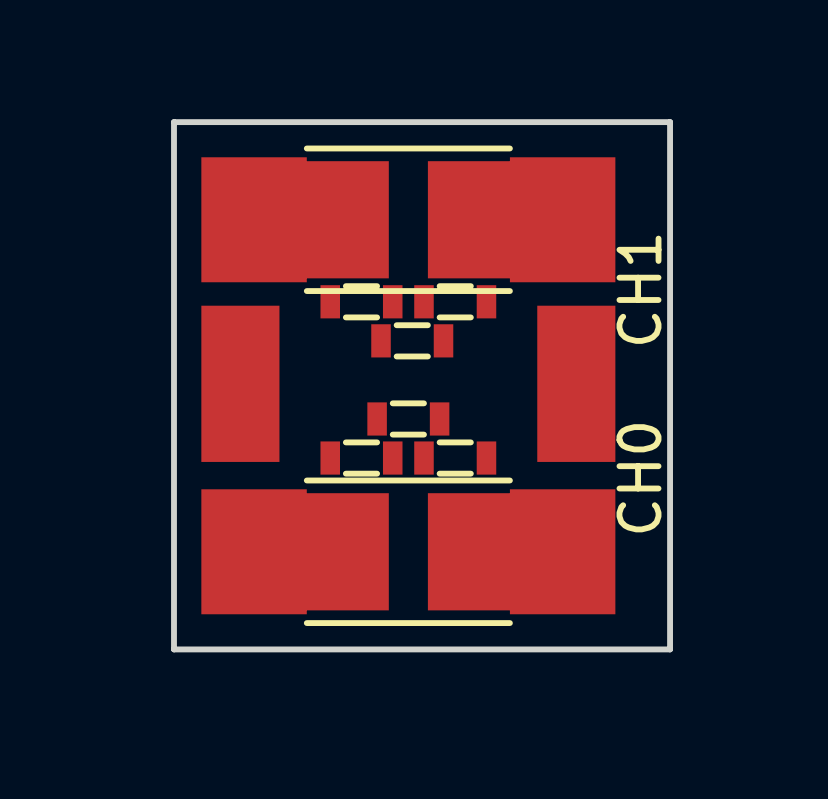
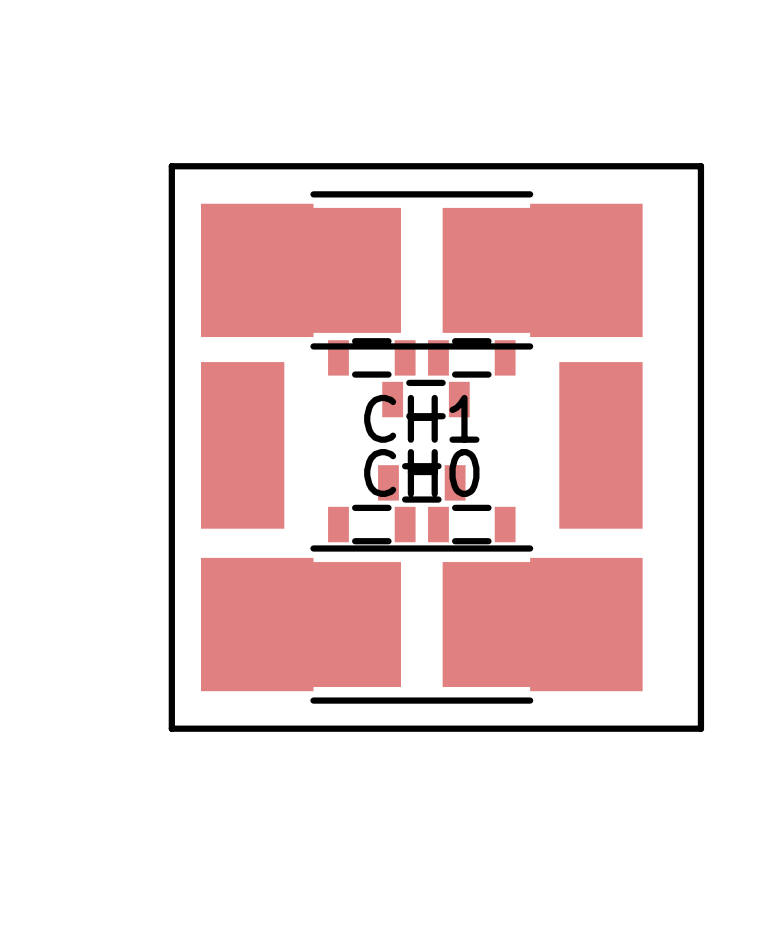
part value rotation: 0° (638, 289) -> 90° clockwise (421, 418)
part value position: CH1 (638, 289) -> CH1 (421, 418)
part value rotation: 0° (638, 478) -> 90° clockwise (421, 472)
part value position: CH0 (638, 478) -> CH0 (421, 472)

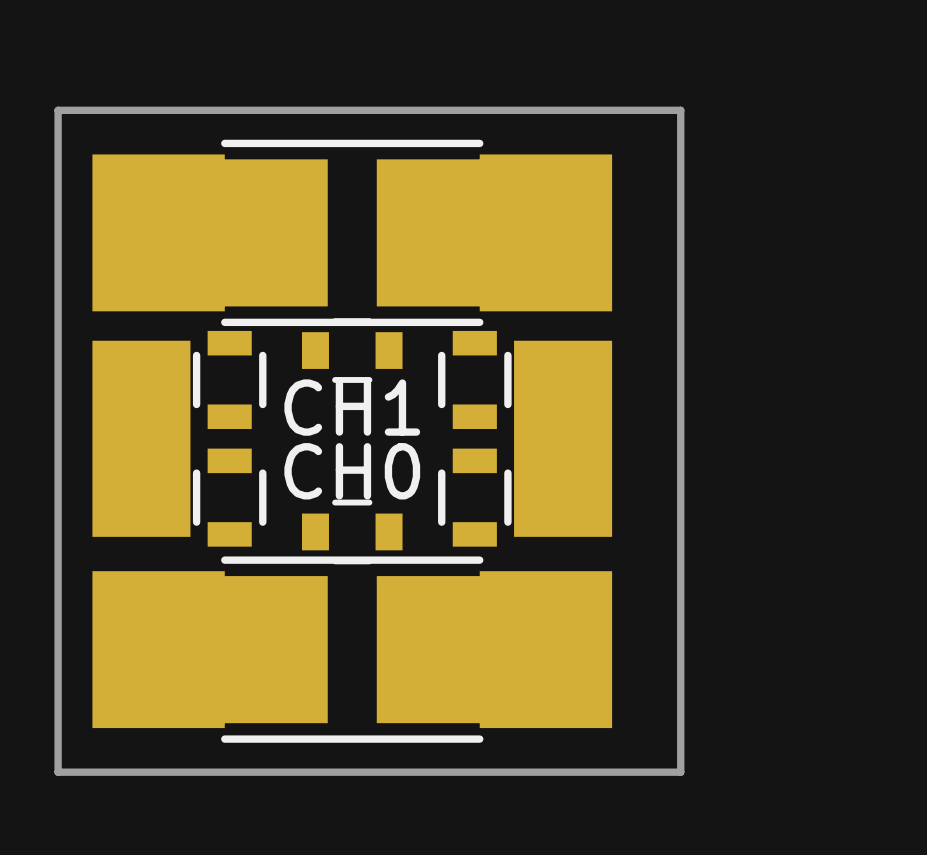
part: (371, 357) -> none
part: (471, 357) -> none
part: none -> (352, 350)
part: none -> (229, 379)
part: none -> (474, 379)
part: (425, 399) -> none
part: (421, 482) -> none
part: none -> (229, 497)
part: none -> (474, 497)
part: (371, 524) -> none
part: none -> (352, 531)
part: (471, 524) -> none

